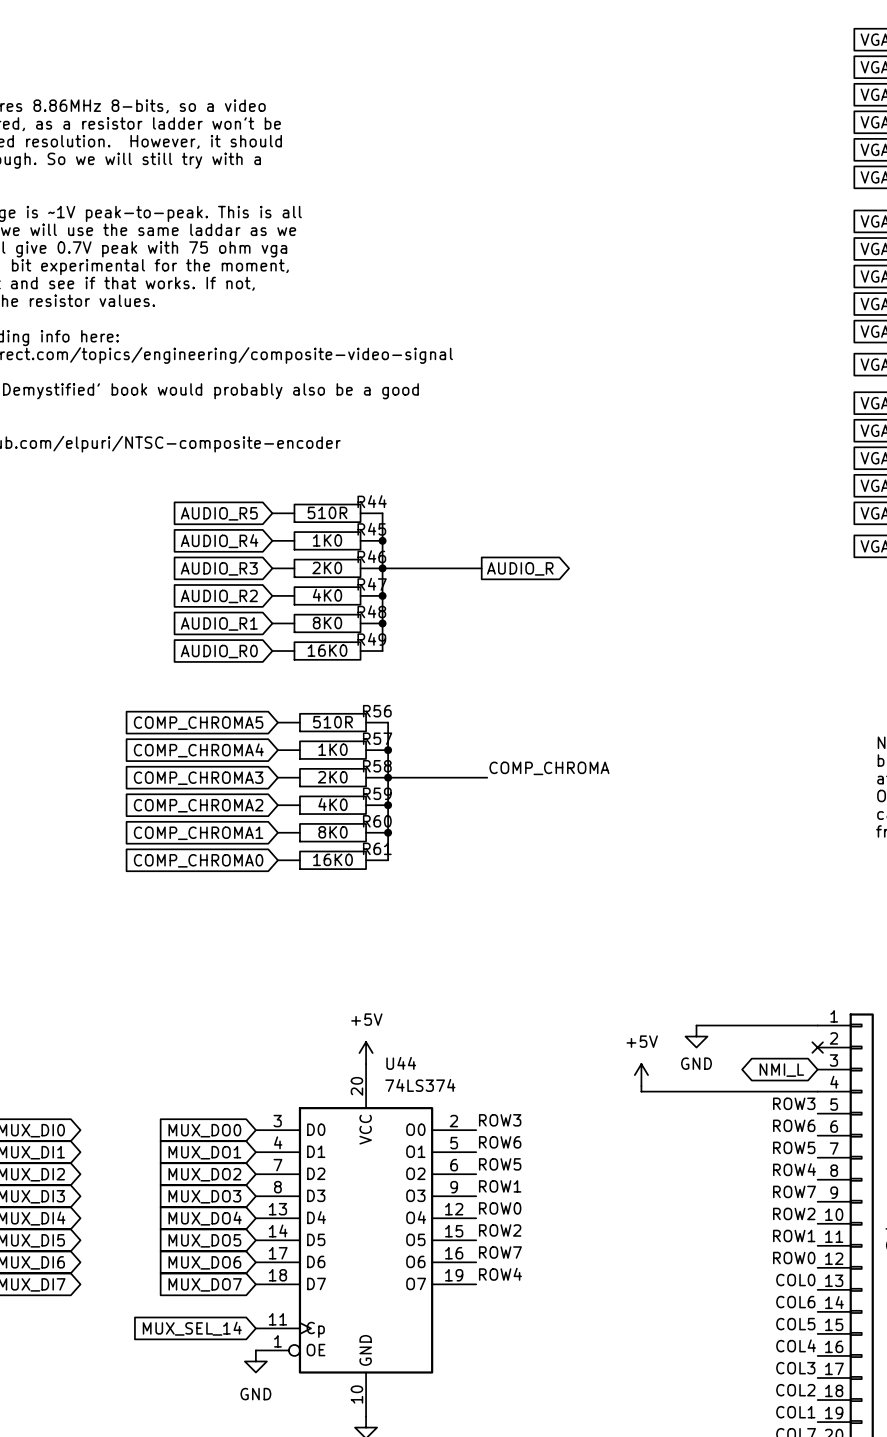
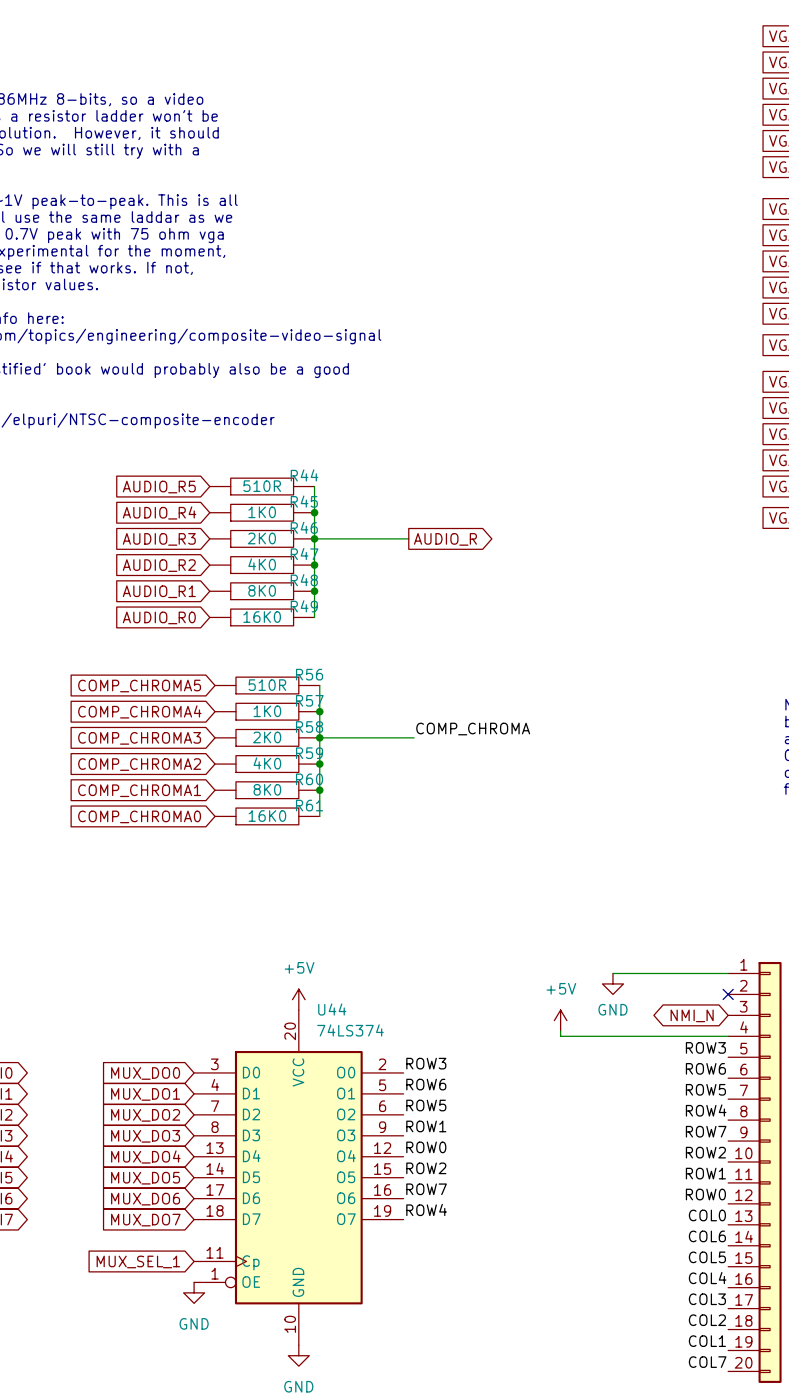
global label: NMI_L (781, 1070) -> NMI_N (692, 1015)
global label: MUX_SEL_14 (192, 1328) -> MUX_SEL_1 (138, 1261)

